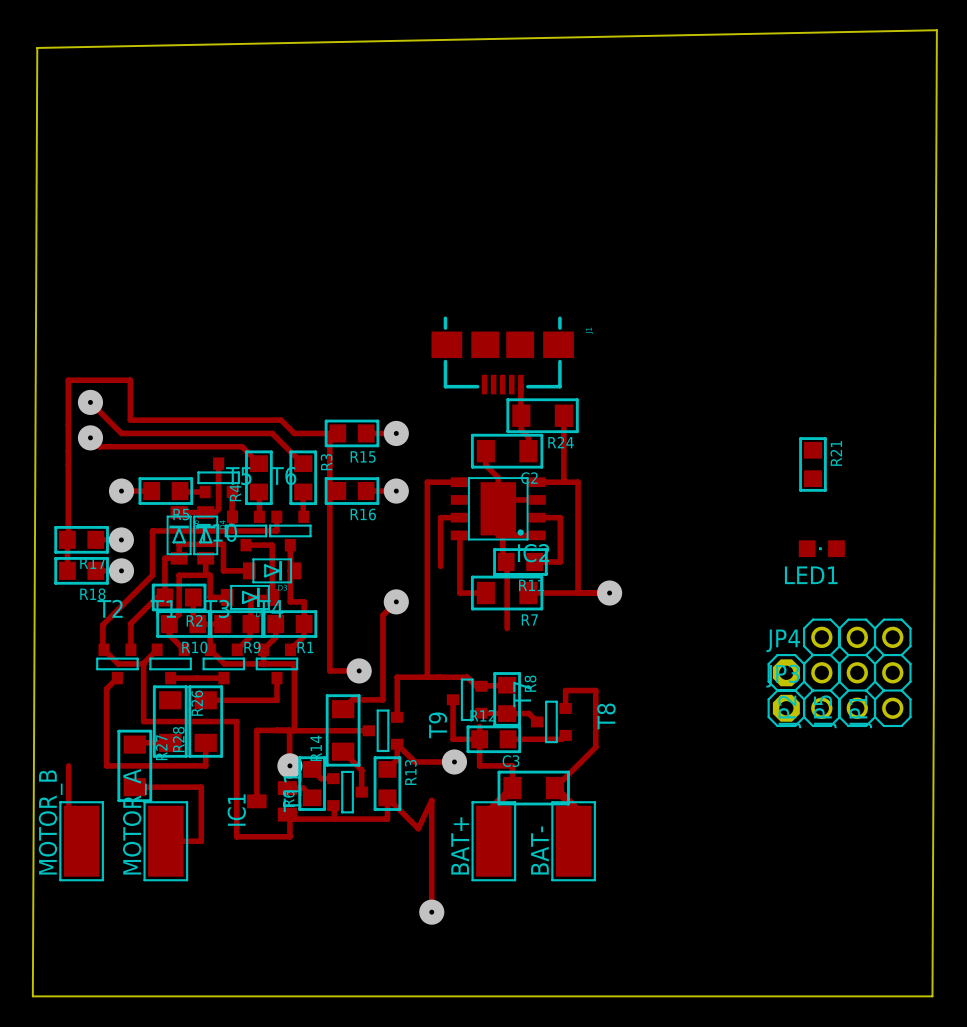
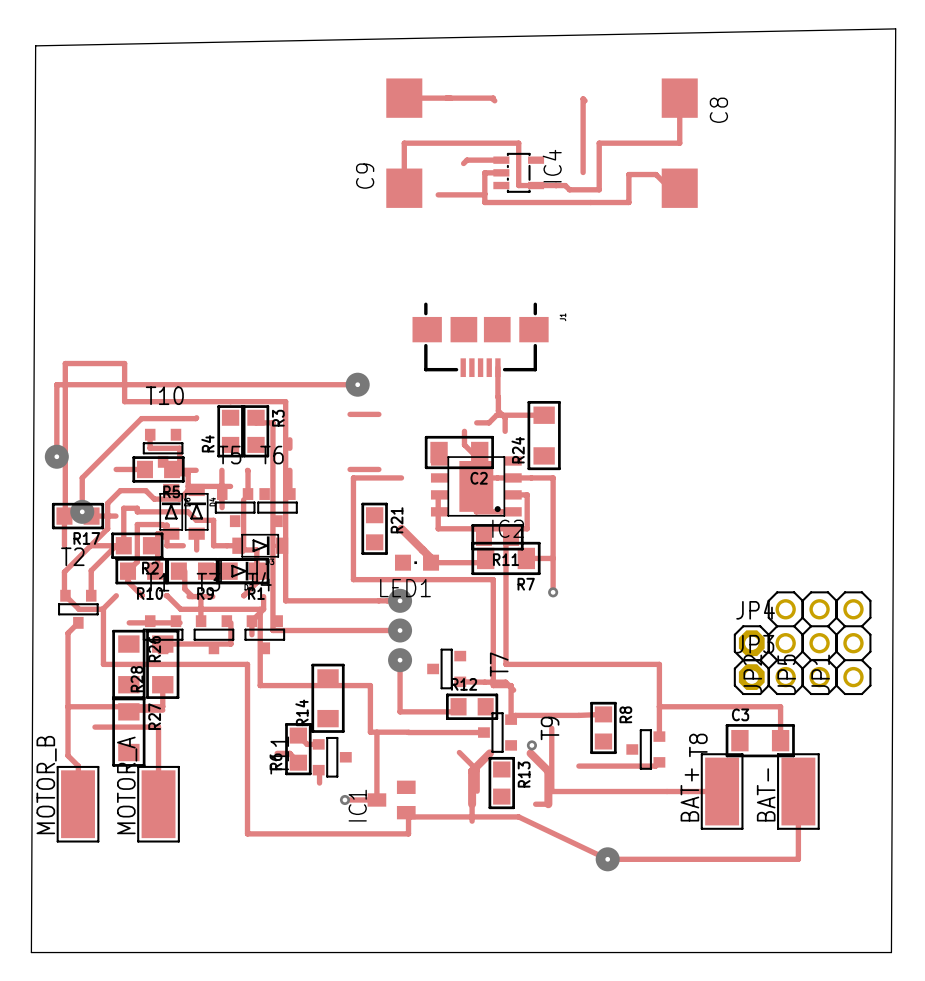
track: none -> (404, 98) (493, 98) (494, 100)
track: none -> (679, 98) (679, 143) (599, 143) (599, 189) (569, 189) (565, 185) (556, 185)
track: none -> (585, 100) (583, 98) (583, 172)
C9: none -> (404, 143)
C8: none -> (679, 143)
track: none -> (501, 160) (467, 160) (463, 163)
track: none -> (501, 172) (484, 172) (484, 202) (628, 202) (628, 174) (656, 174) (669, 188) (679, 188)
IC4: none -> (518, 172)
track: none -> (556, 185) (518, 185) (518, 143) (404, 143) (404, 188)
track: none -> (484, 194) (438, 194)
track: (90, 402) (121, 433) (272, 433) (303, 463) -> none
via: (90, 402) -> none
track: none -> (357, 384) (56, 384) (56, 456)
R24 rotation: 0° (542, 415) -> 90° clockwise (544, 435)
R24 position: (542, 415) -> (544, 435)
track: (563, 415) (564, 482) -> none
track: (281, 420) (294, 433) (337, 433) -> (268, 401) (285, 401) (285, 600) (400, 600)
track: (90, 433) (90, 437) (99, 446) (242, 446) (258, 463) (262, 463) -> none
track: none -> (255, 414) (255, 422) (272, 422) (272, 630) (400, 630)
track: (329, 433) (329, 670) (359, 670) -> none
R15: (351, 433) -> none
via position: (396, 433) -> (357, 384)
track: none -> (544, 415) (496, 415) (489, 422) (476, 422)
track: none -> (196, 417) (141, 418) (82, 477) (82, 511)
via: (90, 437) -> none
C2 position: (507, 451) -> (459, 452)
track: none -> (150, 434) (150, 448) (179, 448) (179, 473) (188, 472)
track: (218, 463) (218, 509) (215, 512) (174, 512) -> none
R21 position: (812, 464) -> (374, 528)
via: none -> (56, 456)
T10 rotation: 0° (218, 477) -> 180° (163, 448)
T10 position: (218, 477) -> (163, 448)
R4 position: (258, 477) -> (230, 431)
R3 position: (303, 477) -> (255, 431)
track: (459, 482) (427, 482) (427, 677) -> none
track: (536, 482) (578, 482) (578, 593) -> none
via: (121, 491) -> none
R16: (351, 491) -> none
via: (396, 491) -> none
track: none -> (188, 473) (188, 490) (179, 499) (154, 499) (145, 490) (120, 490) (107, 503) (107, 528) (64, 572) (65, 595)
track: none -> (401, 477) (353, 477) (353, 579) (493, 579) (493, 685) (511, 685) (511, 719) (515, 715) (603, 714)
track: none -> (513, 477) (553, 477) (553, 592)
track: none -> (188, 486) (230, 486)
track: (276, 516) (276, 530) (152, 530) (152, 575) (102, 624) (103, 649) -> none
track: (458, 517) (440, 517) (440, 566) -> none
track: (551, 517) (560, 517) (560, 561) (534, 561) -> (527, 494) (527, 528) (438, 528) (438, 494)
track: none -> (243, 499) (243, 549) (256, 549) (256, 582) (244, 595)
via: none -> (82, 511)
track: (459, 535) (459, 593) (485, 593) -> none
track: (502, 535) (502, 558) (507, 562) (507, 628) -> none
via: (121, 539) -> none
track: (205, 544) (179, 544) (179, 561) -> (196, 520) (187, 511) (137, 511) (137, 508) (123, 508) (123, 545) (116, 545) (91, 570) (91, 595)
track: (245, 545) (272, 545) (272, 597) (250, 597) (250, 636) (237, 649) -> none
track: (290, 545) (290, 601) (304, 601) (304, 636) (290, 649) -> none
LED1 position: (821, 548) -> (417, 562)
track: none -> (401, 528) (431, 558) (431, 562) (481, 562) (485, 558)
track: none -> (506, 528) (506, 664) (659, 664) (659, 736)
R18: (81, 570) -> none
via: (121, 570) -> none
track: none -> (183, 545) (167, 545) (167, 525) (137, 524) (137, 561) (128, 571) (128, 581) (142, 595)
track: none -> (526, 558) (553, 558)
R7 position: (507, 593) -> (506, 558)
track: (609, 593) (529, 593) -> none
via: (609, 593) -> none
track: (162, 597) (156, 597) (130, 623) (130, 649) -> none
R2 position: (179, 597) -> (137, 545)
track: (227, 597) (210, 597) (210, 575) (179, 575) (179, 614) (169, 624) (169, 635) (184, 649) -> none
track: (396, 601) (383, 615) (383, 699) (352, 699) (343, 709) -> none
via: (396, 601) -> none
via: none -> (553, 592)
track: none -> (116, 595) (103, 608) (103, 664) (247, 664) (247, 833) (408, 833) (407, 813)
track: none -> (166, 595) (180, 609) (260, 609) (260, 685) (370, 685) (370, 732) (408, 732)
R10 position: (183, 624) -> (141, 571)
R9 position: (236, 624) -> (192, 571)
R1 position: (289, 624) -> (243, 571)
via: none -> (400, 600)
track: (103, 646) (103, 649) (118, 663) (143, 663) -> (65, 592) (65, 595) (79, 609) (103, 609)
track: (157, 649) (143, 663) (143, 721) (236, 721) (236, 836) (289, 836) (289, 816) -> none
track: (209, 649) (224, 663) (294, 663) (294, 730) (256, 730) (256, 801) -> none
via: none -> (400, 630)
T2 position: (117, 663) -> (78, 609)
via: (359, 670) -> none
track: (117, 678) (106, 688) (106, 765) (205, 765) (205, 742) -> none
track: (170, 678) (223, 678) -> (129, 622) (180, 622)
track: (276, 678) (276, 700) (205, 700) -> (230, 622) (230, 644) (162, 644)
track: (507, 685) (476, 686) (467, 677) (397, 677) (397, 717) -> none
track: none -> (400, 660) (400, 711) (459, 711)
via: none -> (400, 660)
track: (453, 699) (453, 739) (479, 739) -> none
R8 position: (507, 699) -> (603, 727)
track: (565, 708) (565, 690) (595, 690) (595, 747) (554, 788) (560, 788) -> none
track: none -> (162, 684) (162, 706) (68, 706)
R26 position: (170, 721) -> (128, 664)
R28 position: (205, 721) -> (162, 664)
T8 position: (551, 721) -> (645, 749)
track: (479, 726) (479, 765) (512, 765) (512, 788) -> none
track: (289, 730) (368, 730) -> (408, 732) (483, 732)
track: (289, 730) (289, 765) -> none
T9 position: (383, 730) -> (497, 732)
track: (565, 735) (561, 739) (508, 739) -> none
track: none -> (659, 706) (780, 706) (780, 740) (785, 741)
track: (343, 751) (361, 770) (361, 792) -> (459, 752) (477, 770) (477, 791)
track: (454, 761) (414, 761) (397, 744) (397, 759) (387, 769) -> none
via: (454, 761) -> none
track: none -> (551, 728) (551, 791) (722, 791) (722, 808)
track: (68, 765) (68, 828) (81, 841) -> (78, 622) (68, 633) (68, 755) (78, 766) (78, 803)
via: (289, 765) -> none
track: none -> (376, 732) (376, 799) (344, 799)
via: none -> (531, 745)
R13 position: (387, 783) -> (501, 783)
track: (134, 787) (201, 787) (201, 841) (165, 841) -> (94, 727) (158, 727) (158, 804)
C3 position: (533, 788) -> (760, 740)
track: none -> (659, 762) (655, 766) (578, 766)
IC1 position: (272, 801) -> (391, 799)
track: (287, 814) (292, 819) (387, 819) (387, 797) (418, 828) (431, 800) (431, 912) -> none
track: none -> (785, 791) (798, 791) (798, 859) (607, 859) (518, 816) (410, 816) (406, 812)
via: none -> (344, 799)
BAT+ position: (493, 841) -> (722, 791)
BAT- position: (573, 841) -> (798, 791)
via: none -> (607, 859)
via: (431, 912) -> none

